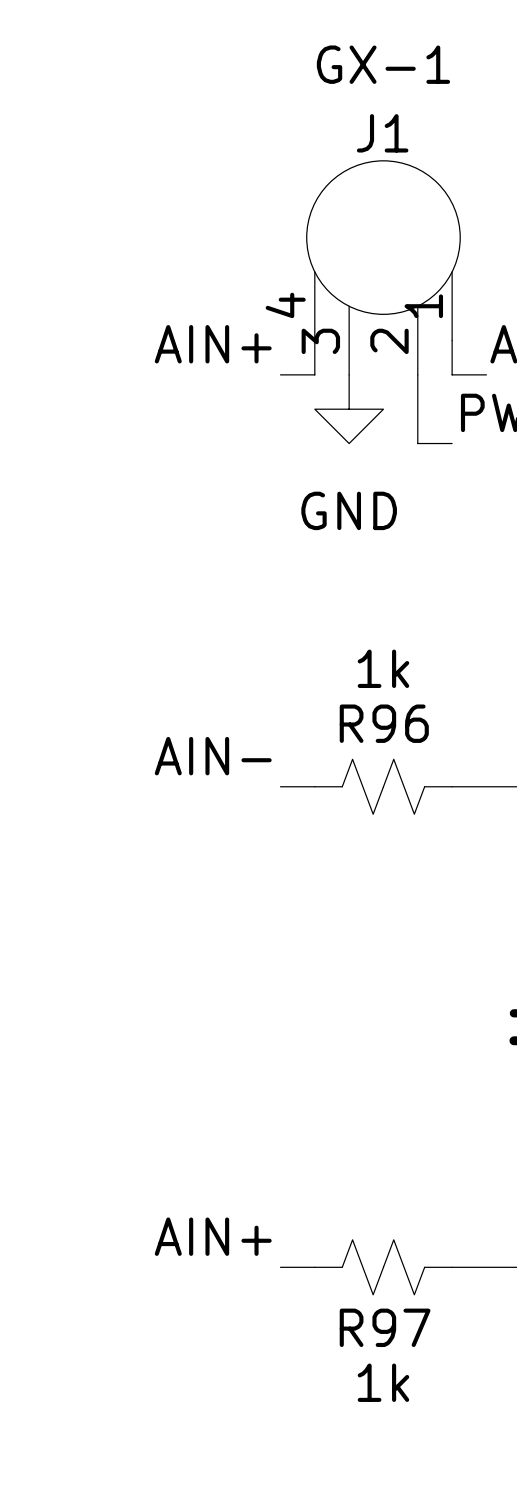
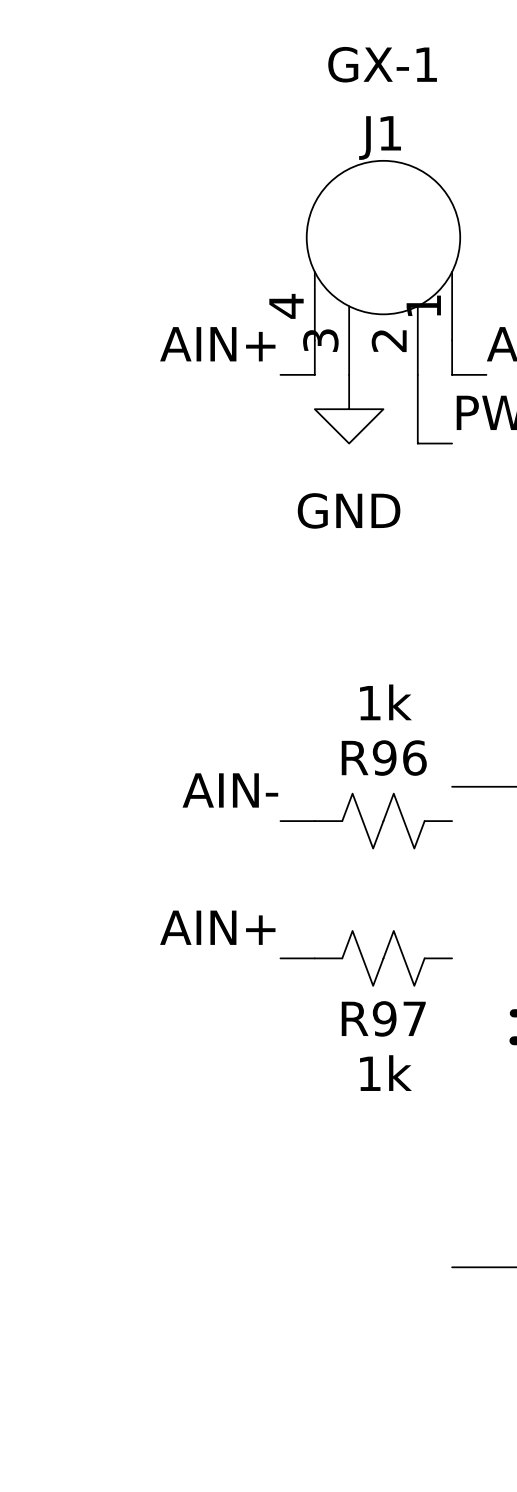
label position: AIN- (213, 756) -> AIN- (230, 790)
wire: (280, 786) (314, 786) -> (280, 821) (314, 821)
R96 position: (383, 786) -> (383, 821)
label position: AIN+ (213, 1236) -> AIN+ (217, 927)
wire: (280, 1267) (314, 1267) -> (280, 958) (314, 958)
R97 position: (383, 1267) -> (383, 958)

